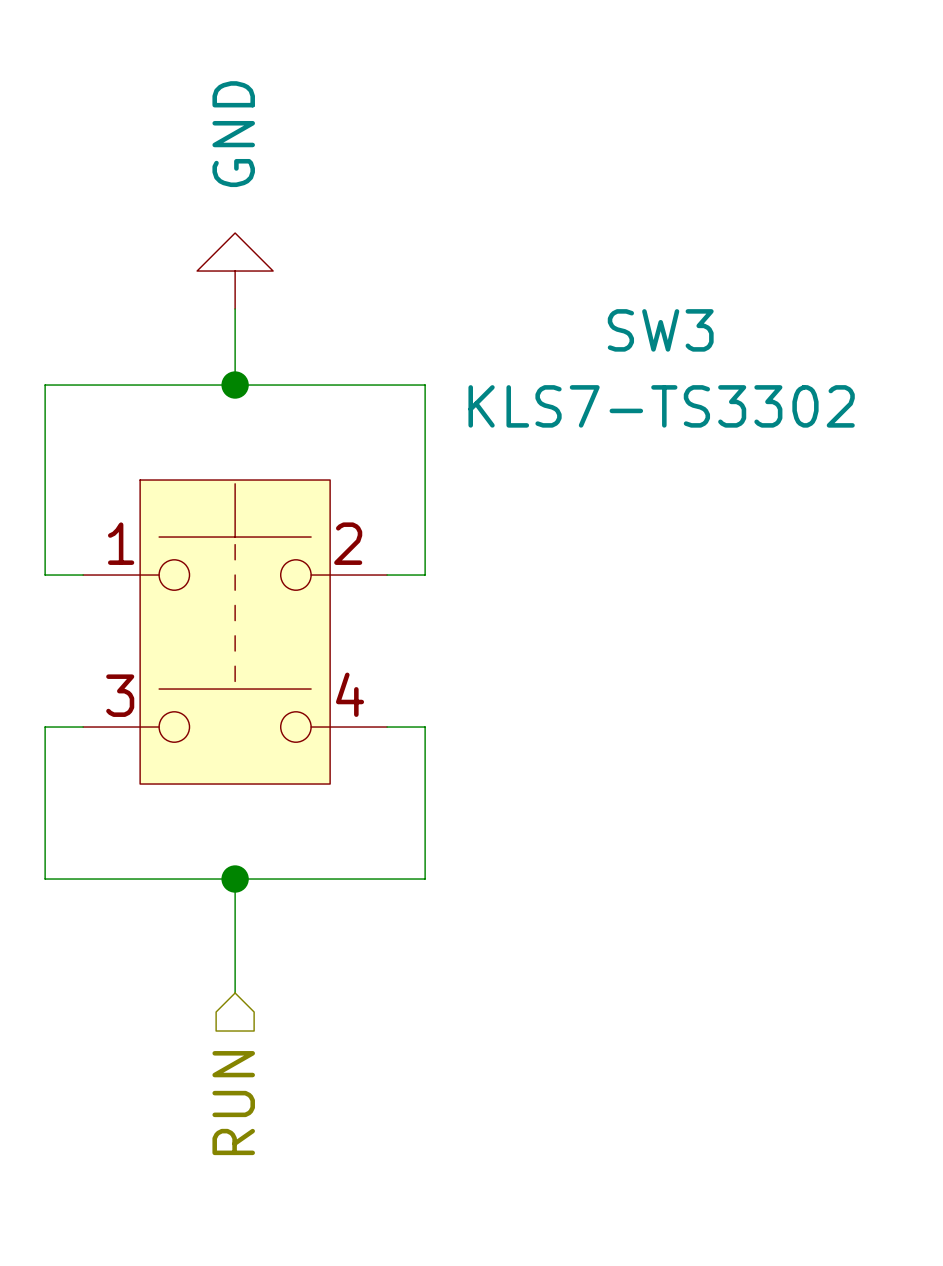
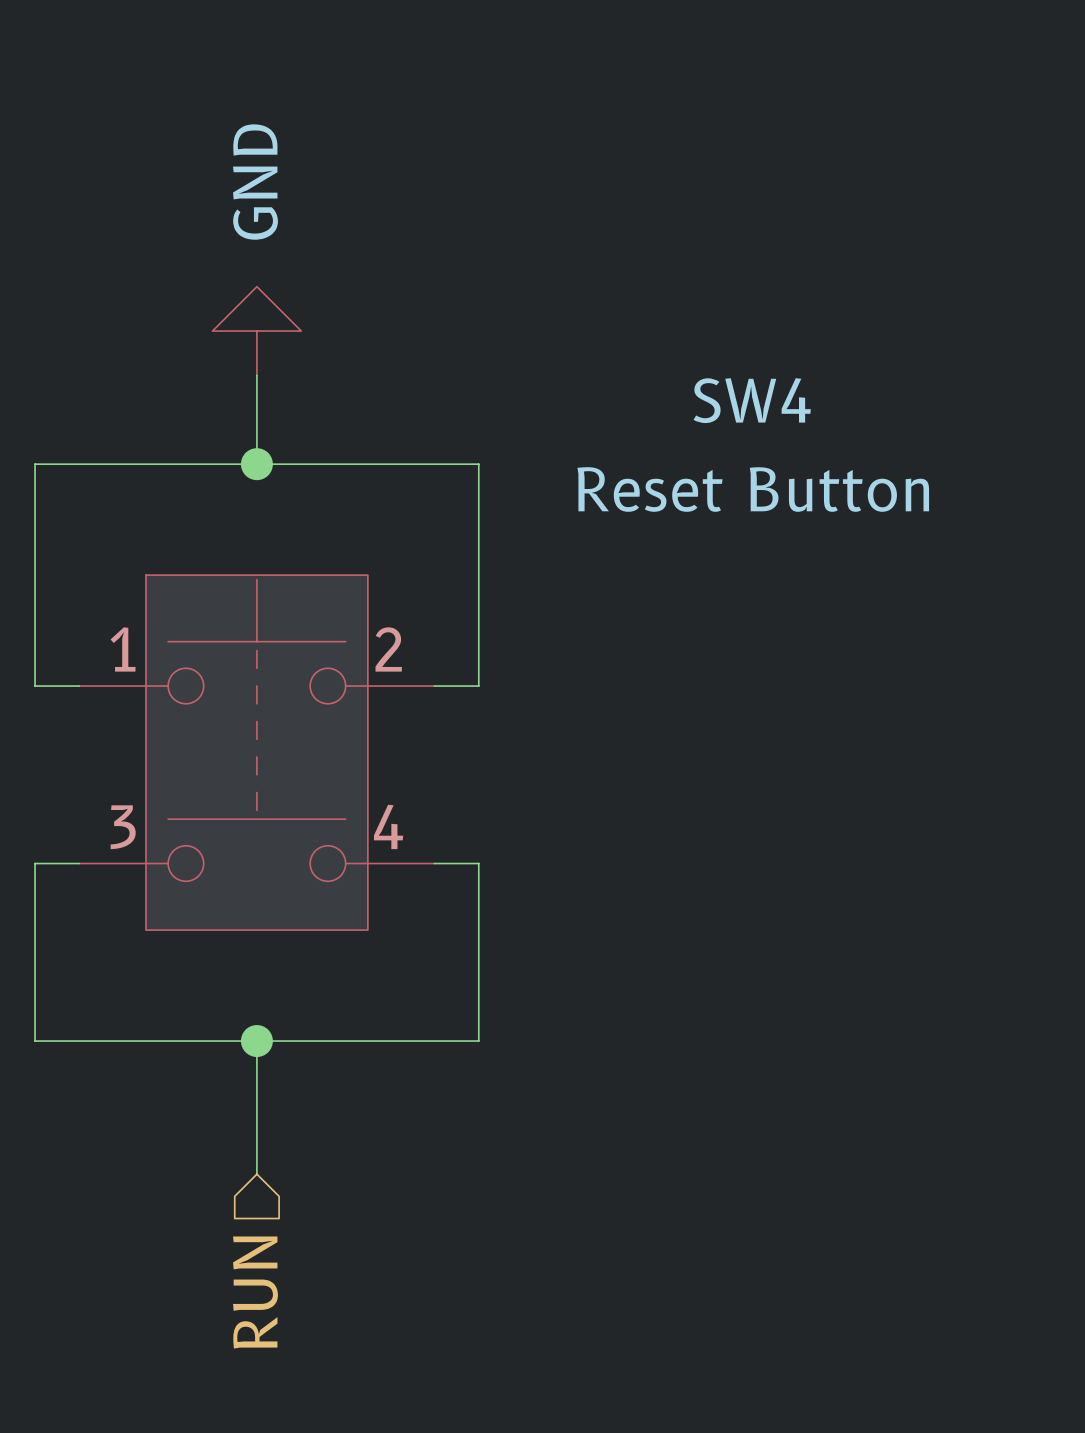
SW3 name: SW3 (660, 330) -> SW4 (752, 400)
SW3 value: KLS7-TS3302 (661, 406) -> Reset Button (753, 489)

